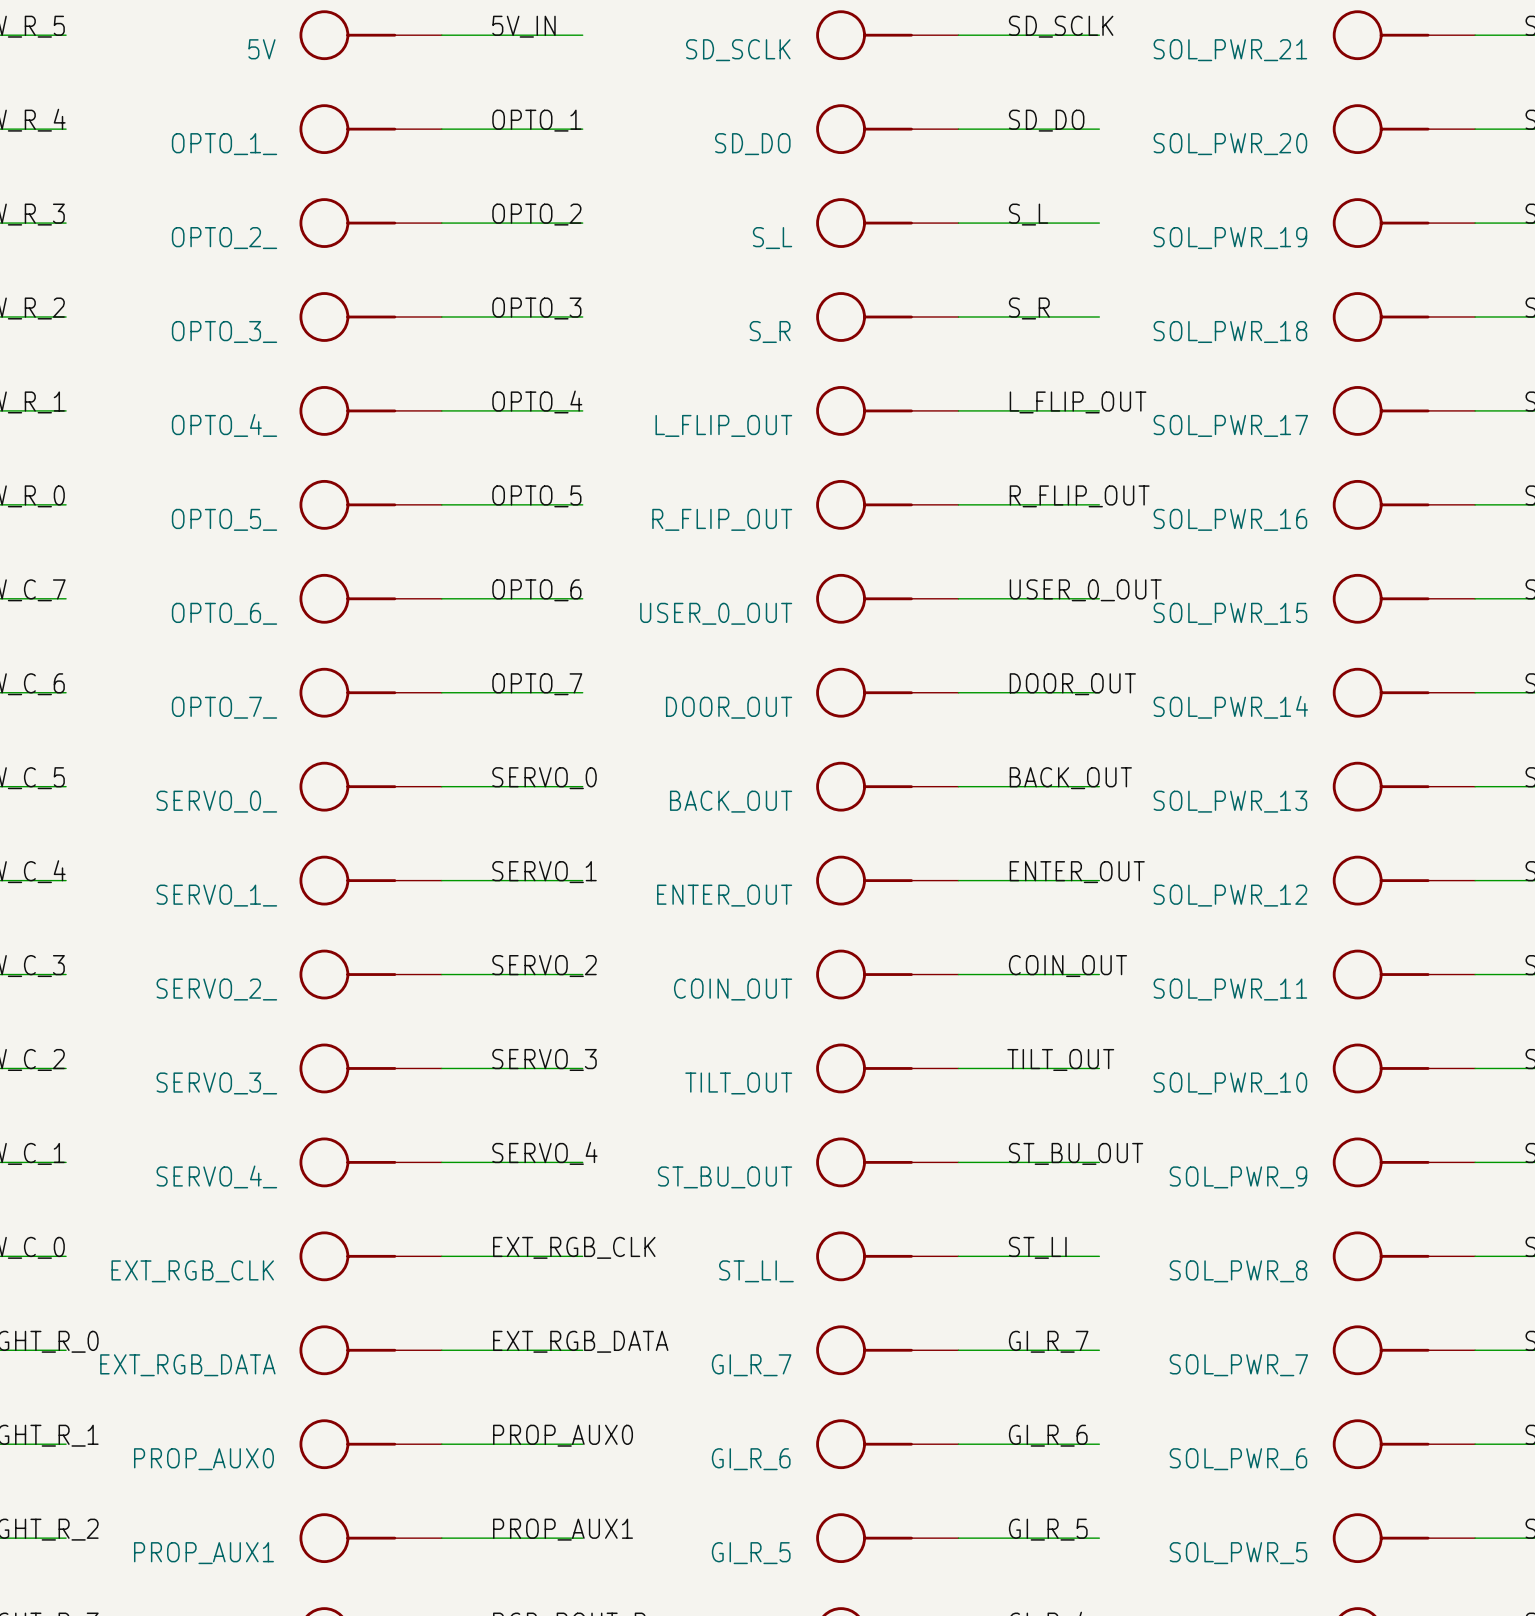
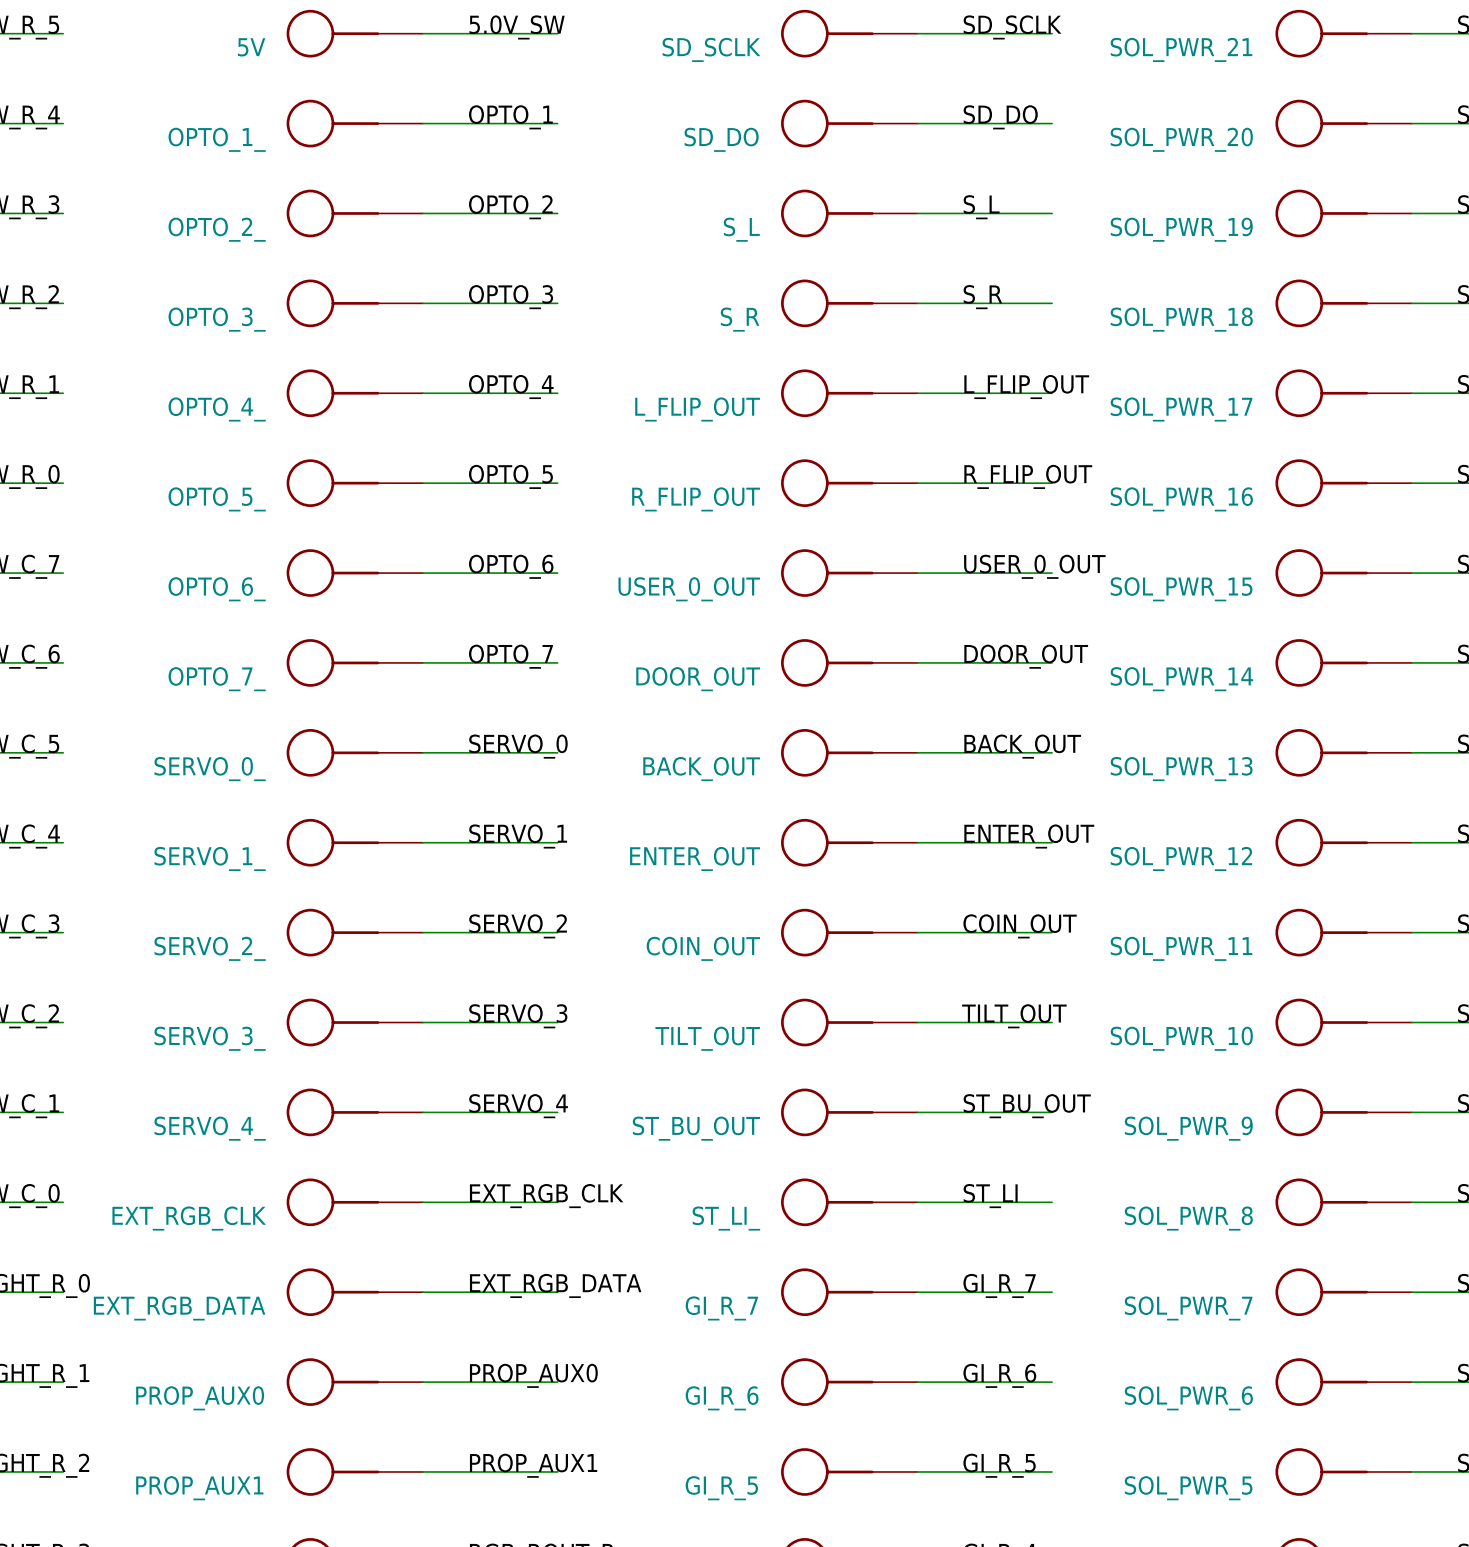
label: 5V_IN (523, 26) -> 5.0V_SW (517, 27)

